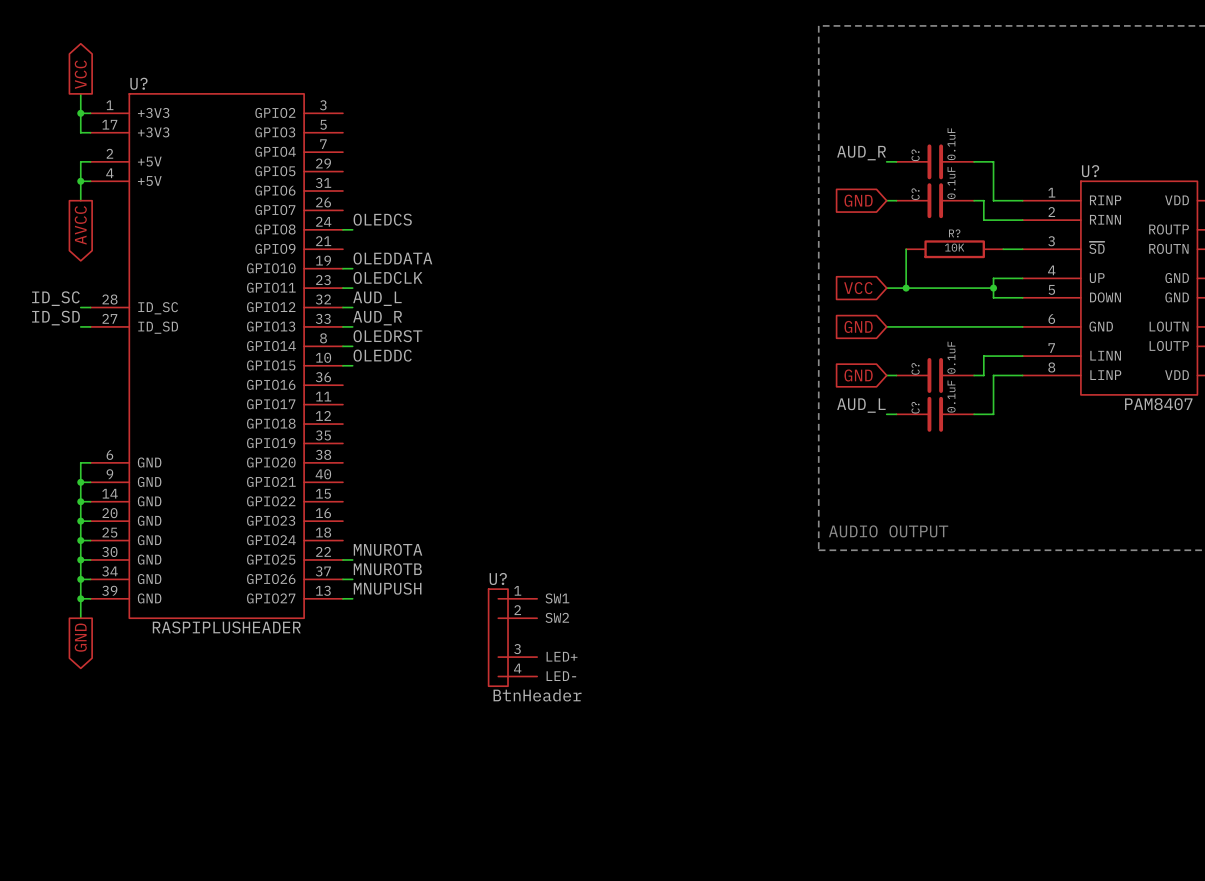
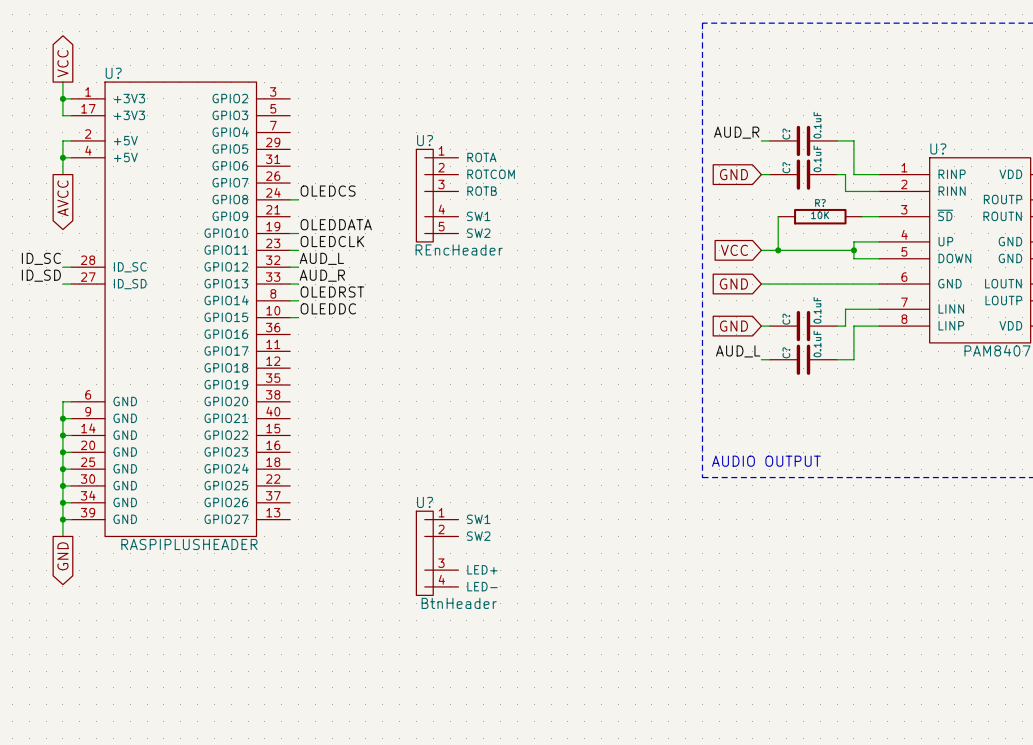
U?: none -> REncHeader (437, 195)
label: MNUROTA (388, 549) -> none
wire: (342, 559) (352, 559) -> none
label: MNUROTB (387, 569) -> none
wire: (342, 579) (352, 579) -> none
label: MNUPUSH (387, 588) -> none
wire: (342, 598) (352, 598) -> none

